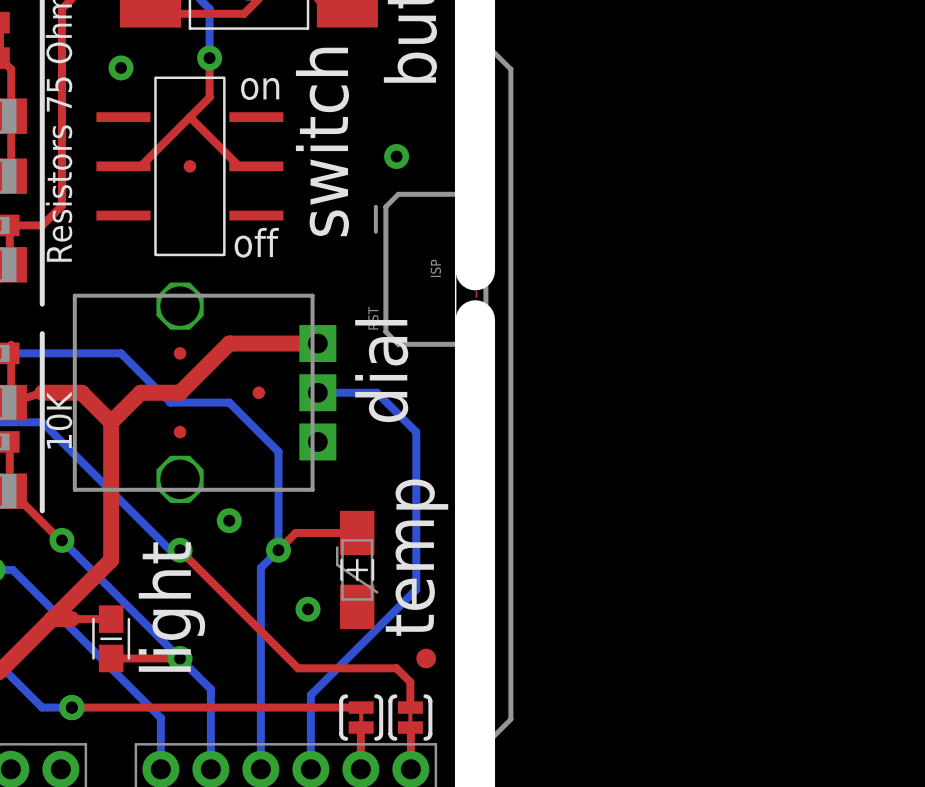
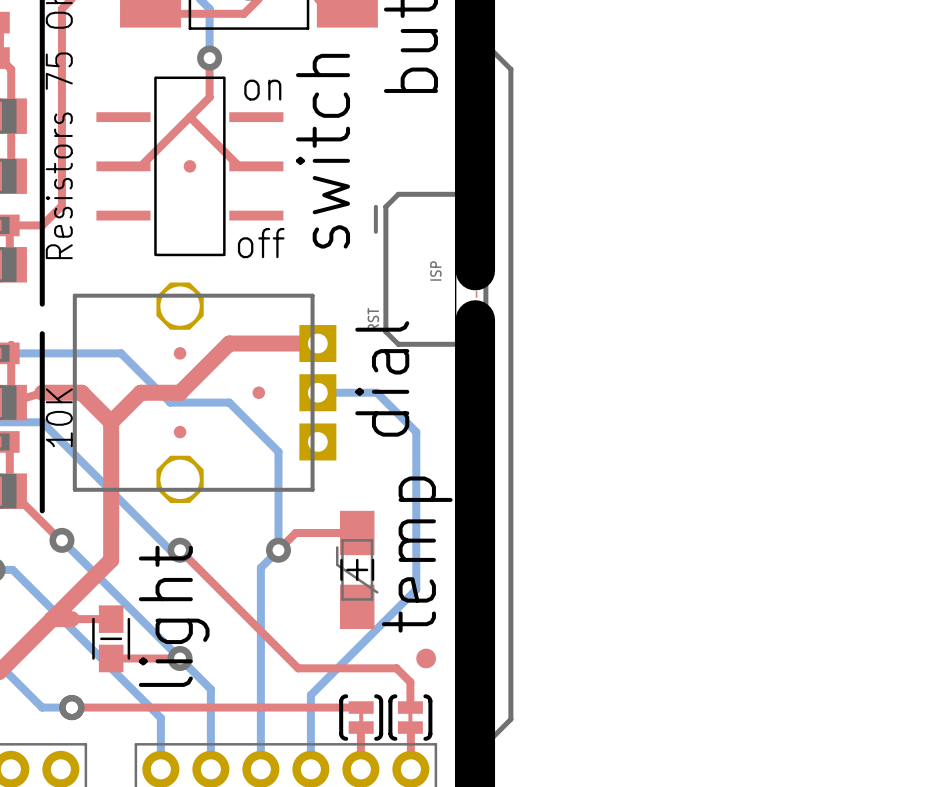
via: (121, 67) -> none
via: (396, 156) -> none
via: (229, 520) -> none
via: (308, 609) -> none

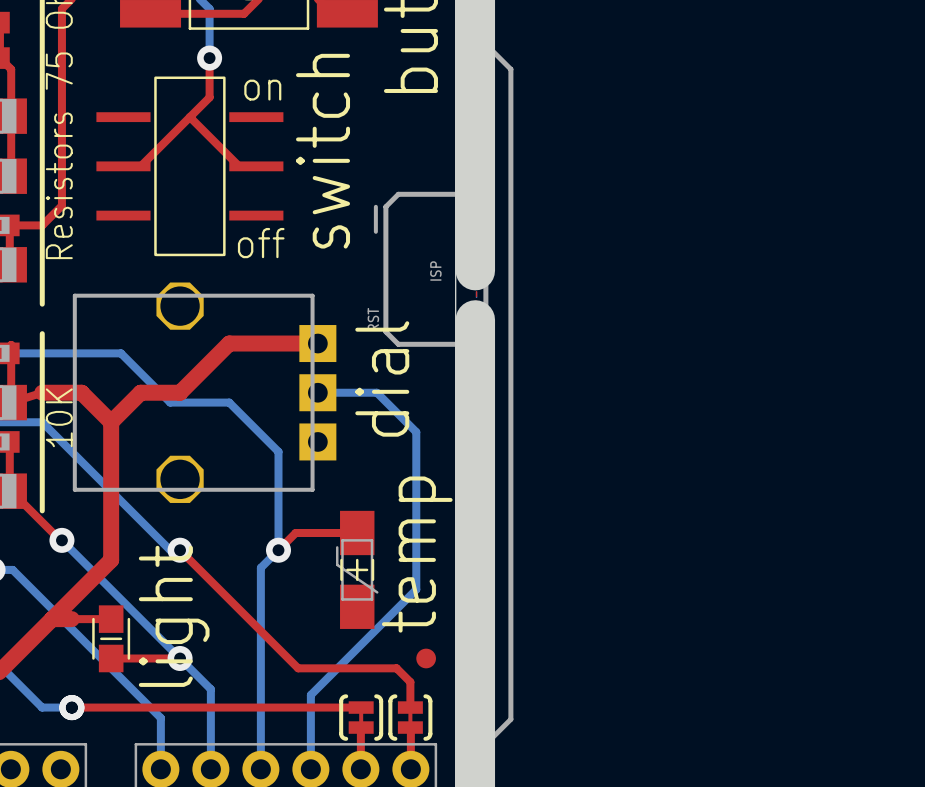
part: (189, 166) -> none
part: (180, 353) -> none
part: (258, 392) -> none
part: (180, 432) -> none

